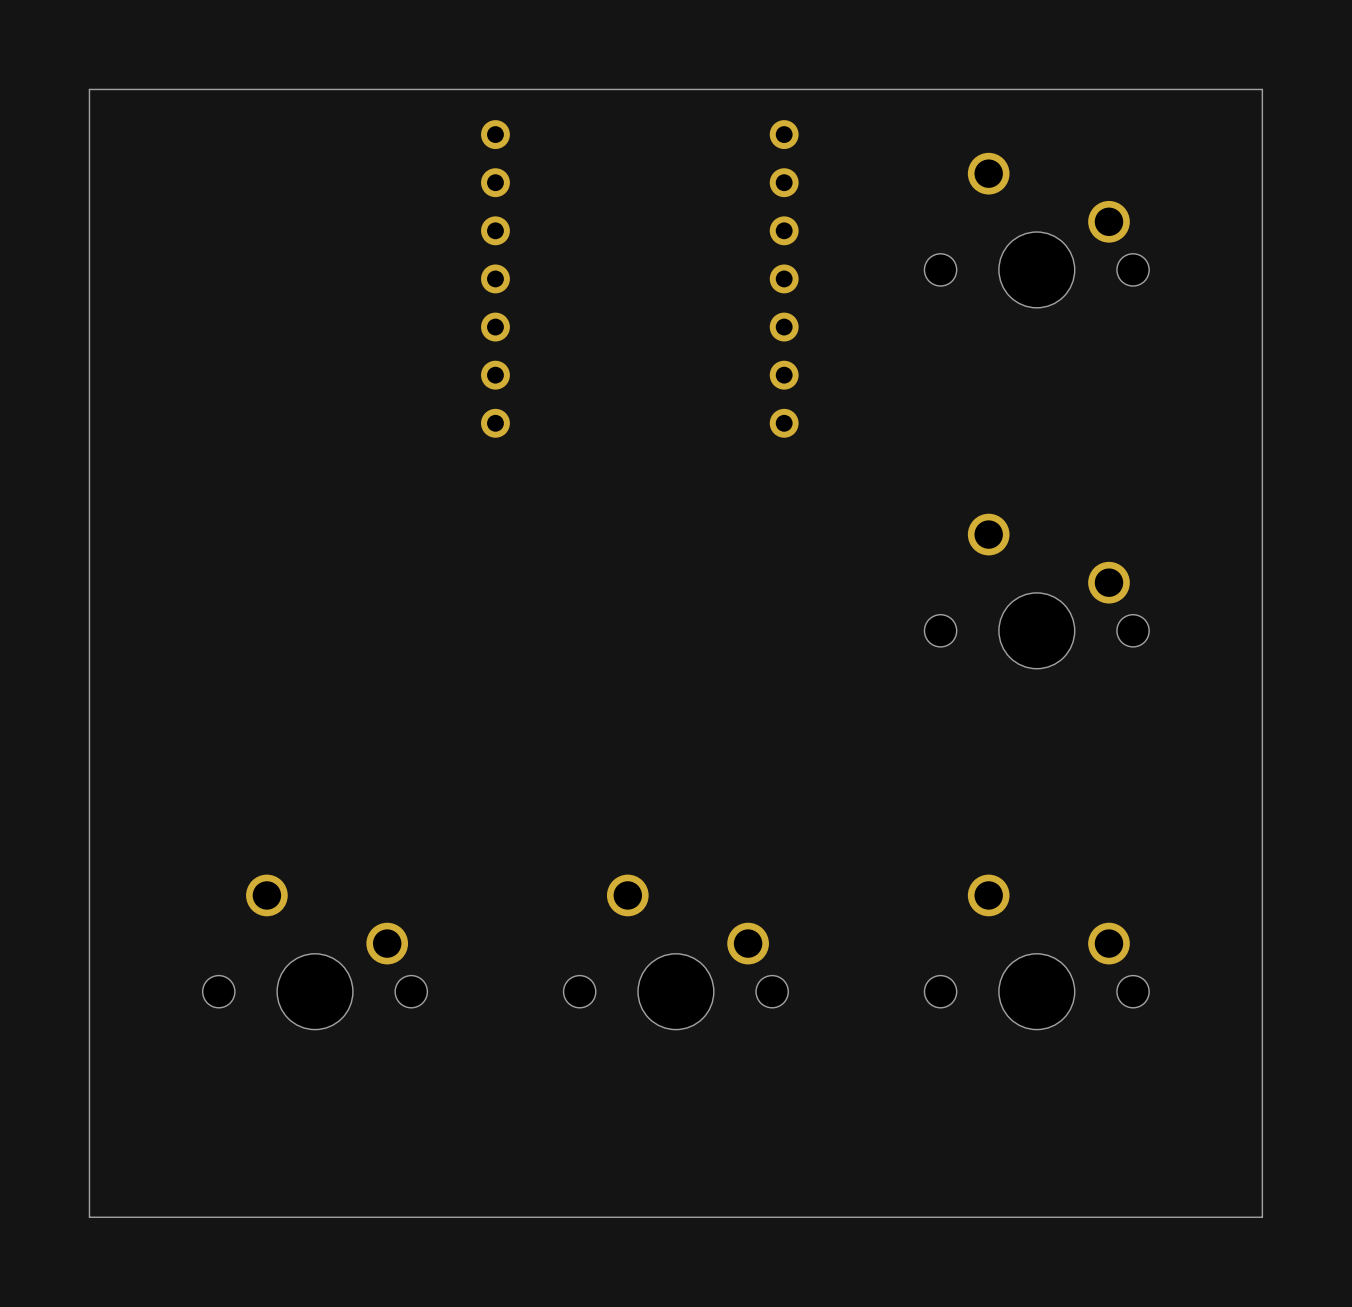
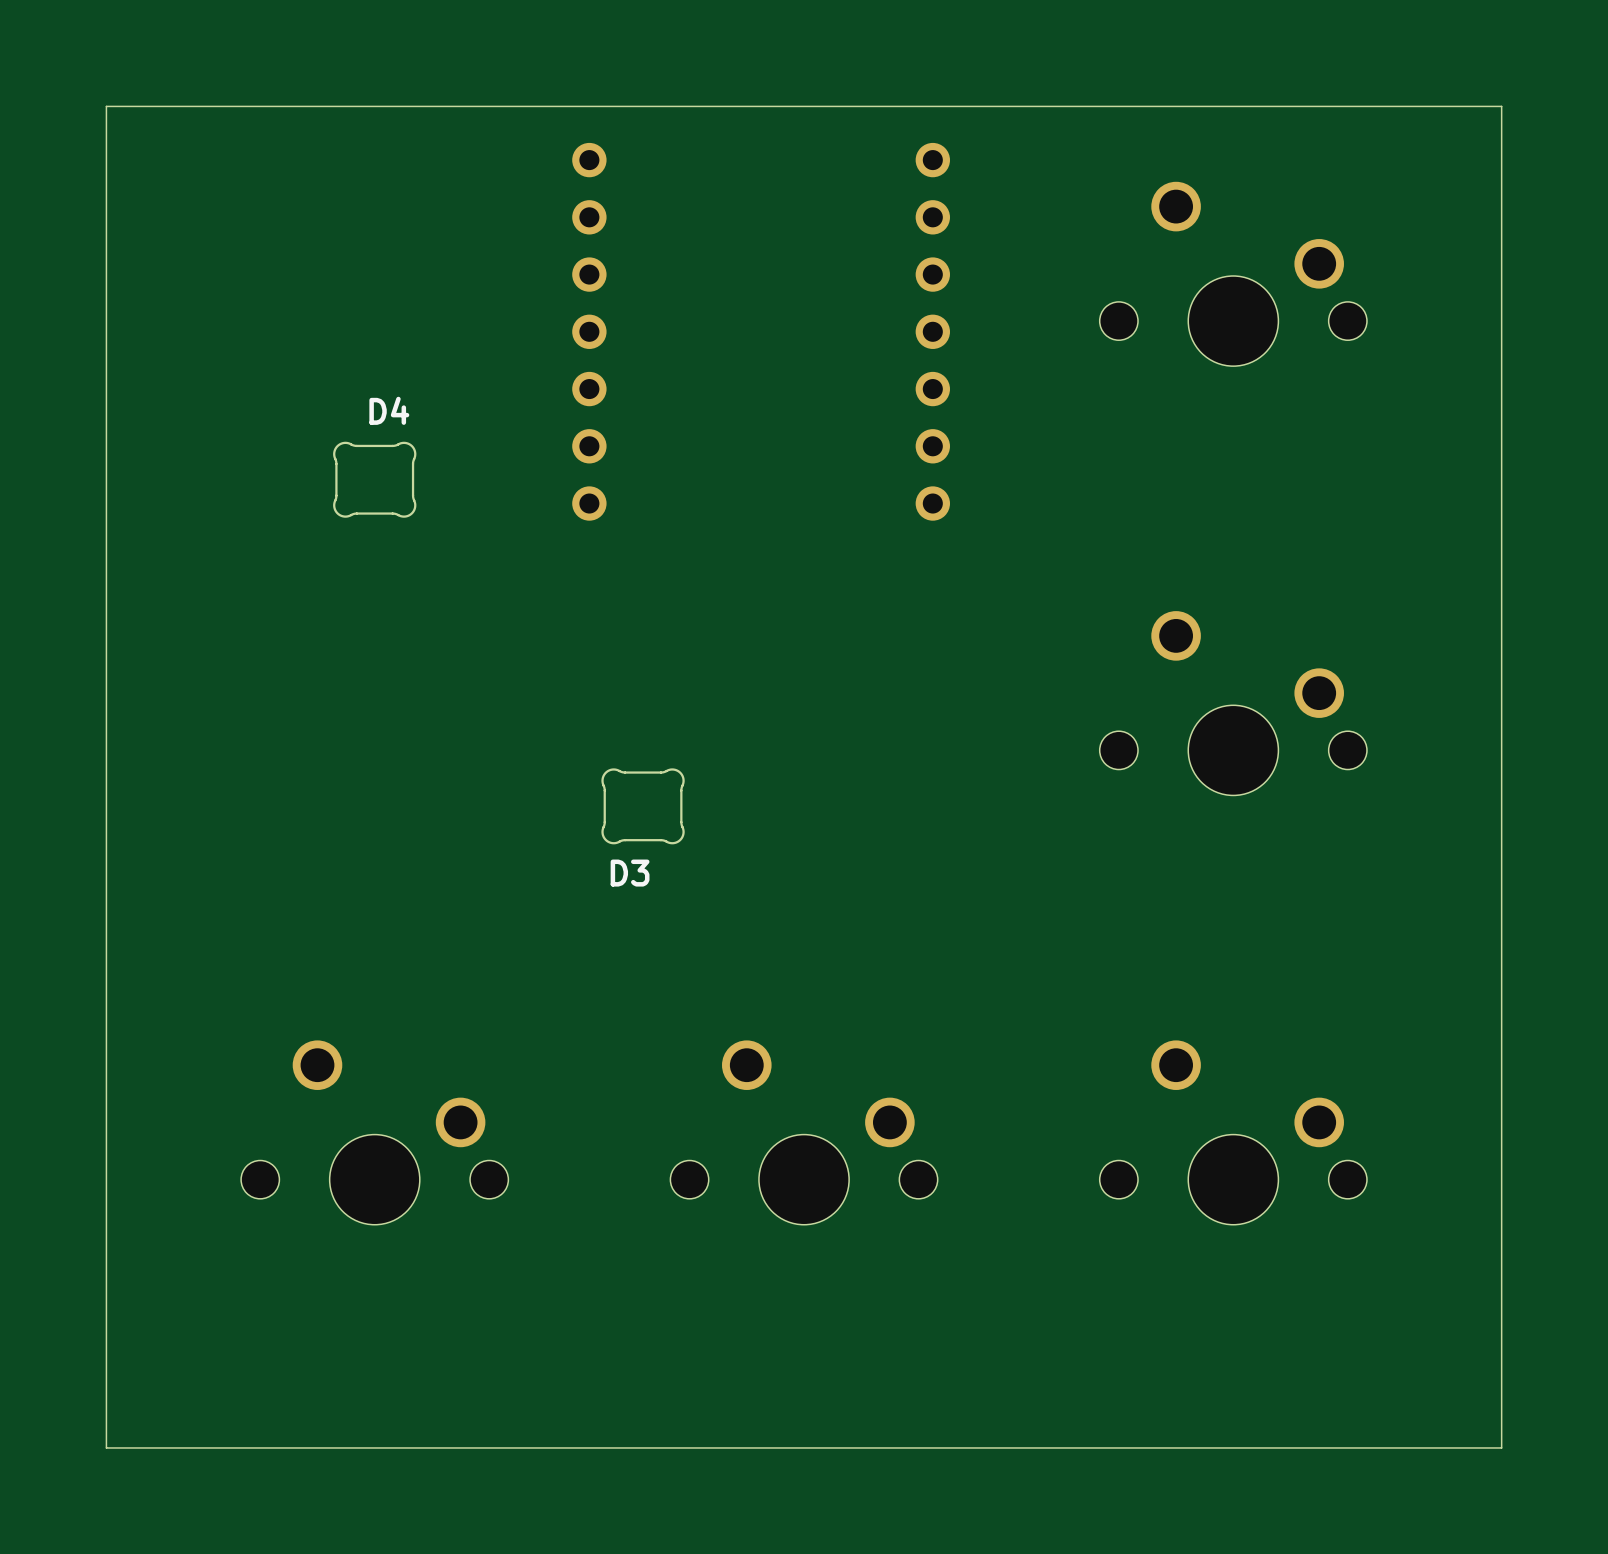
D4: none -> (374, 479)
D3: none -> (643, 806)

